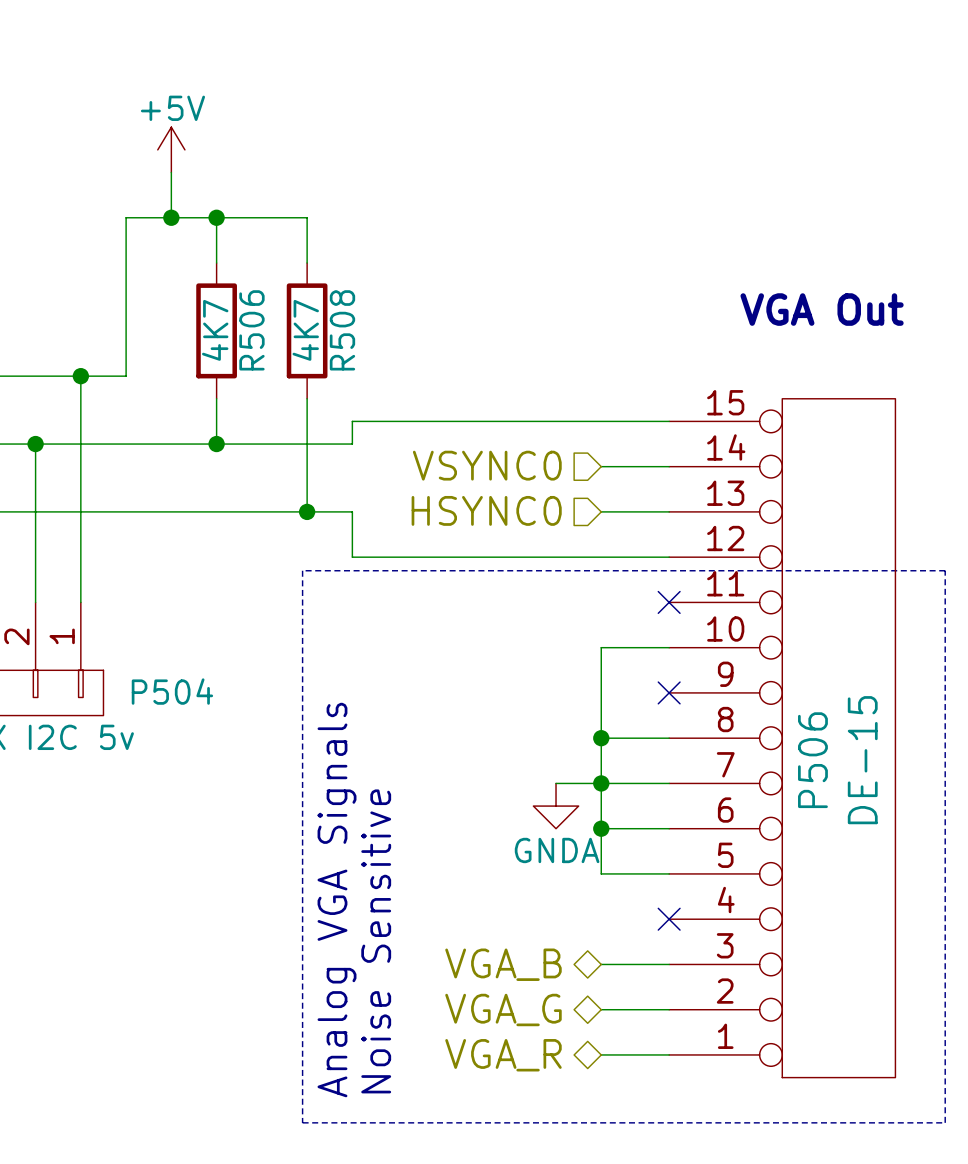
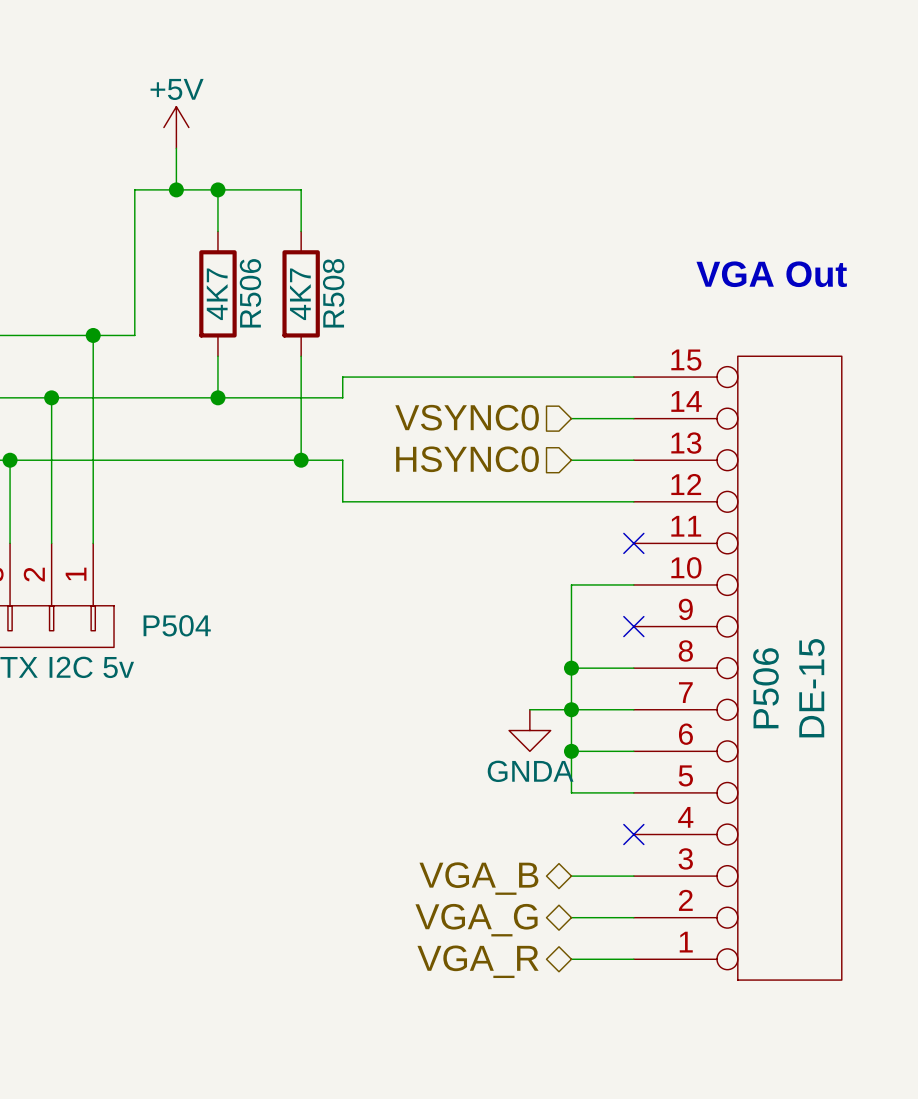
line: (302, 570) (302, 1122) (945, 1122) (945, 570) (302, 570) -> none
text: Analog VGA Signals (337, 900) -> none
text: Noise Sensitive (376, 941) -> none

